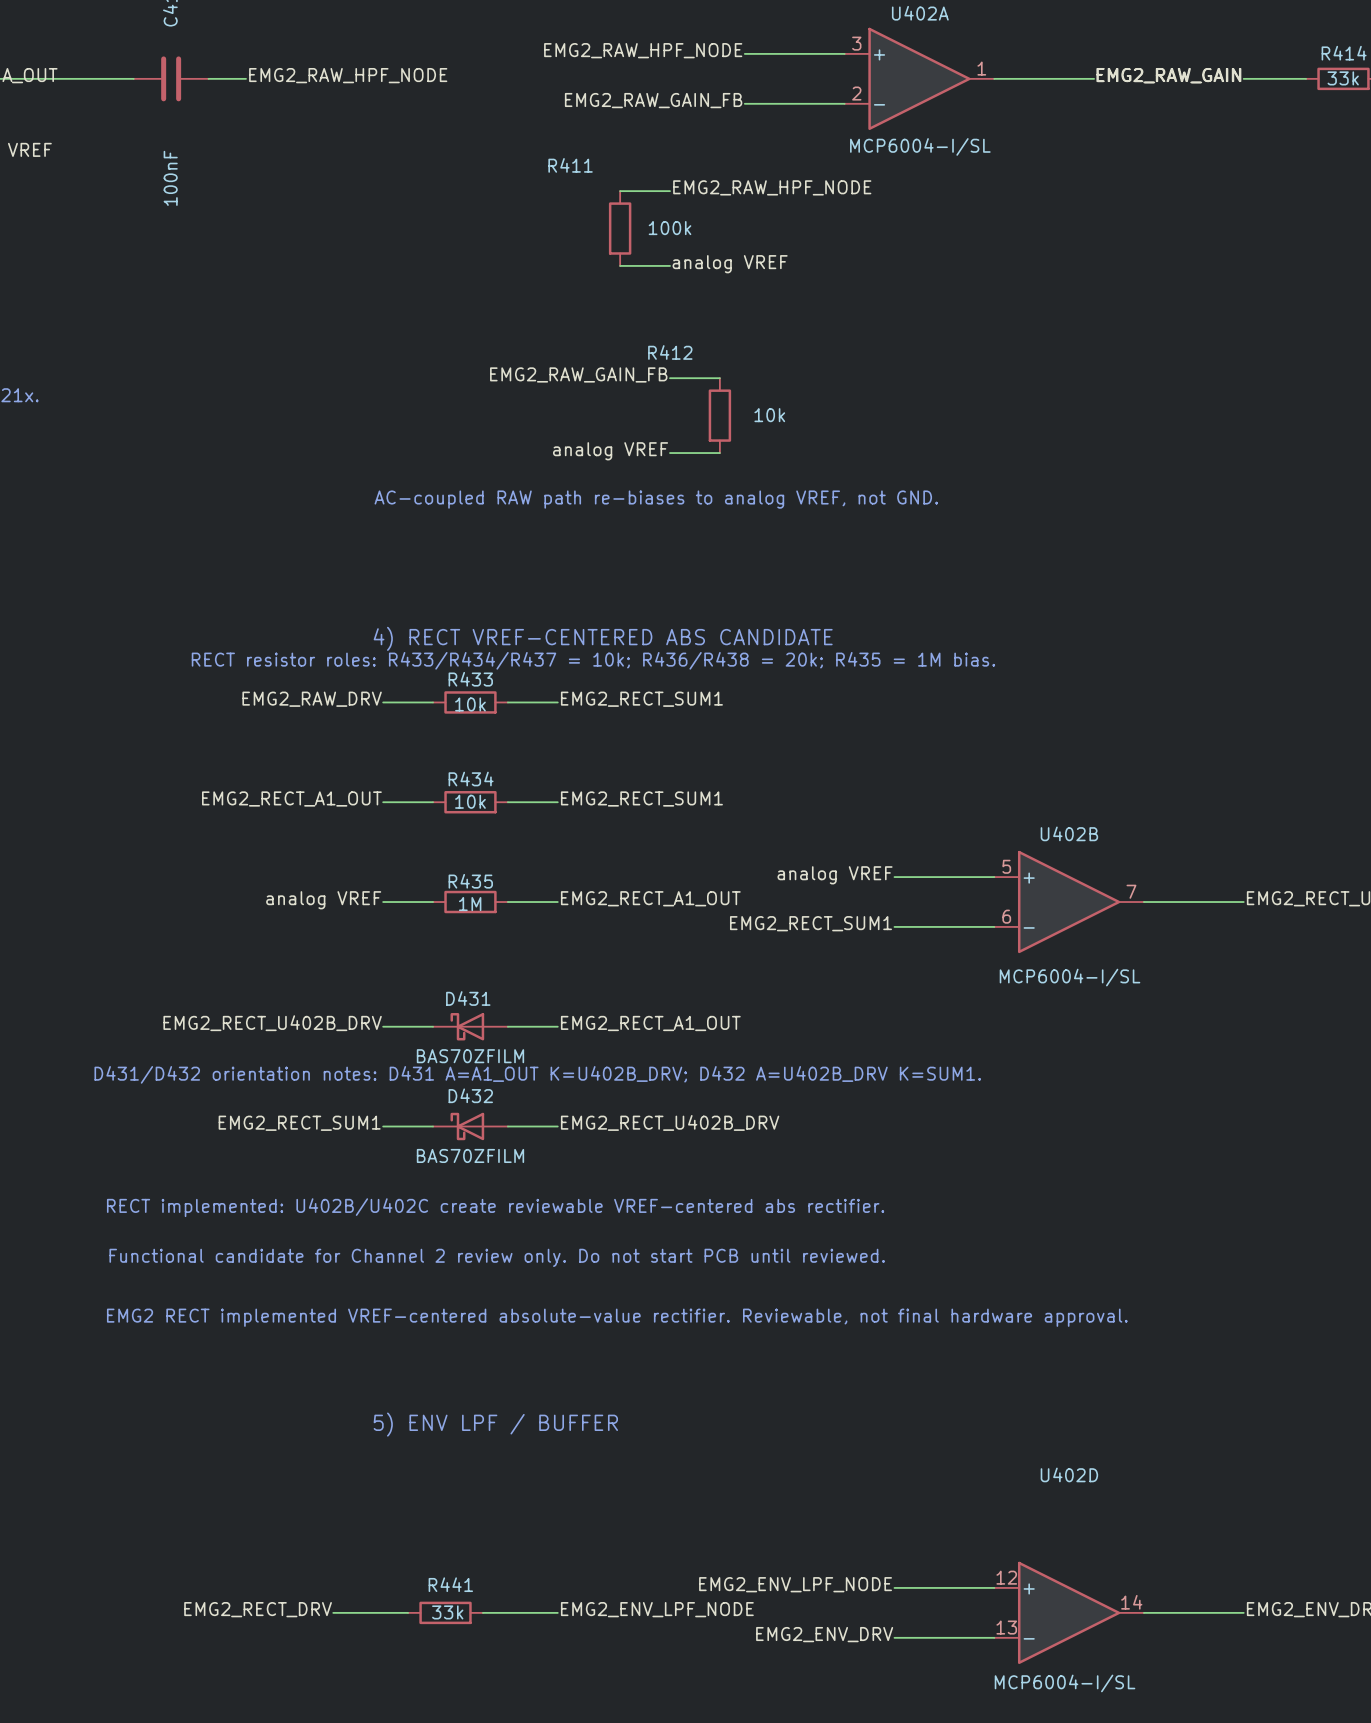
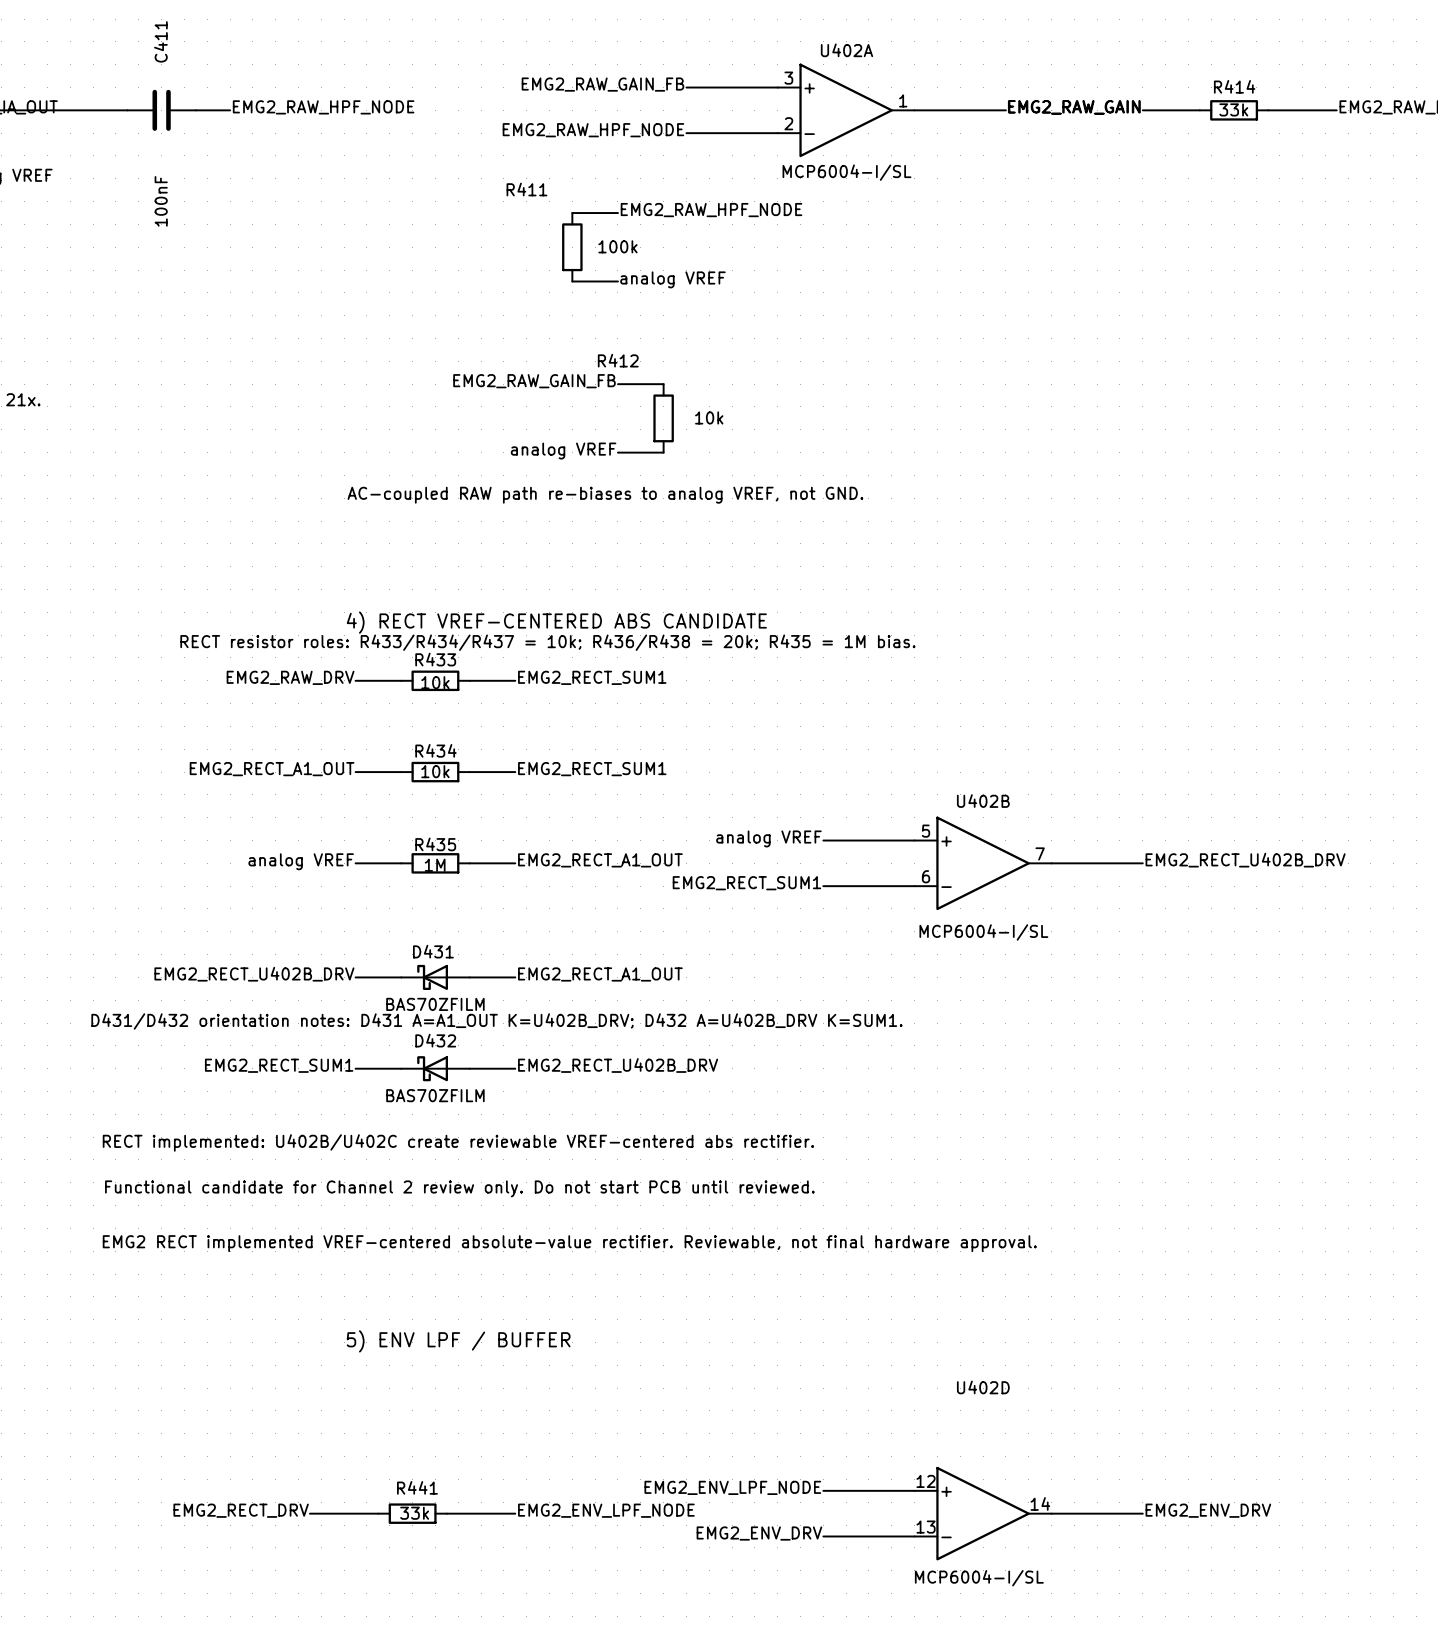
label: EMG2_RAW_HPF_NODE (643, 50) -> EMG2_RAW_GAIN_FB (602, 84)
label: EMG2_RAW_GAIN_FB (653, 100) -> EMG2_RAW_HPF_NODE (593, 130)

